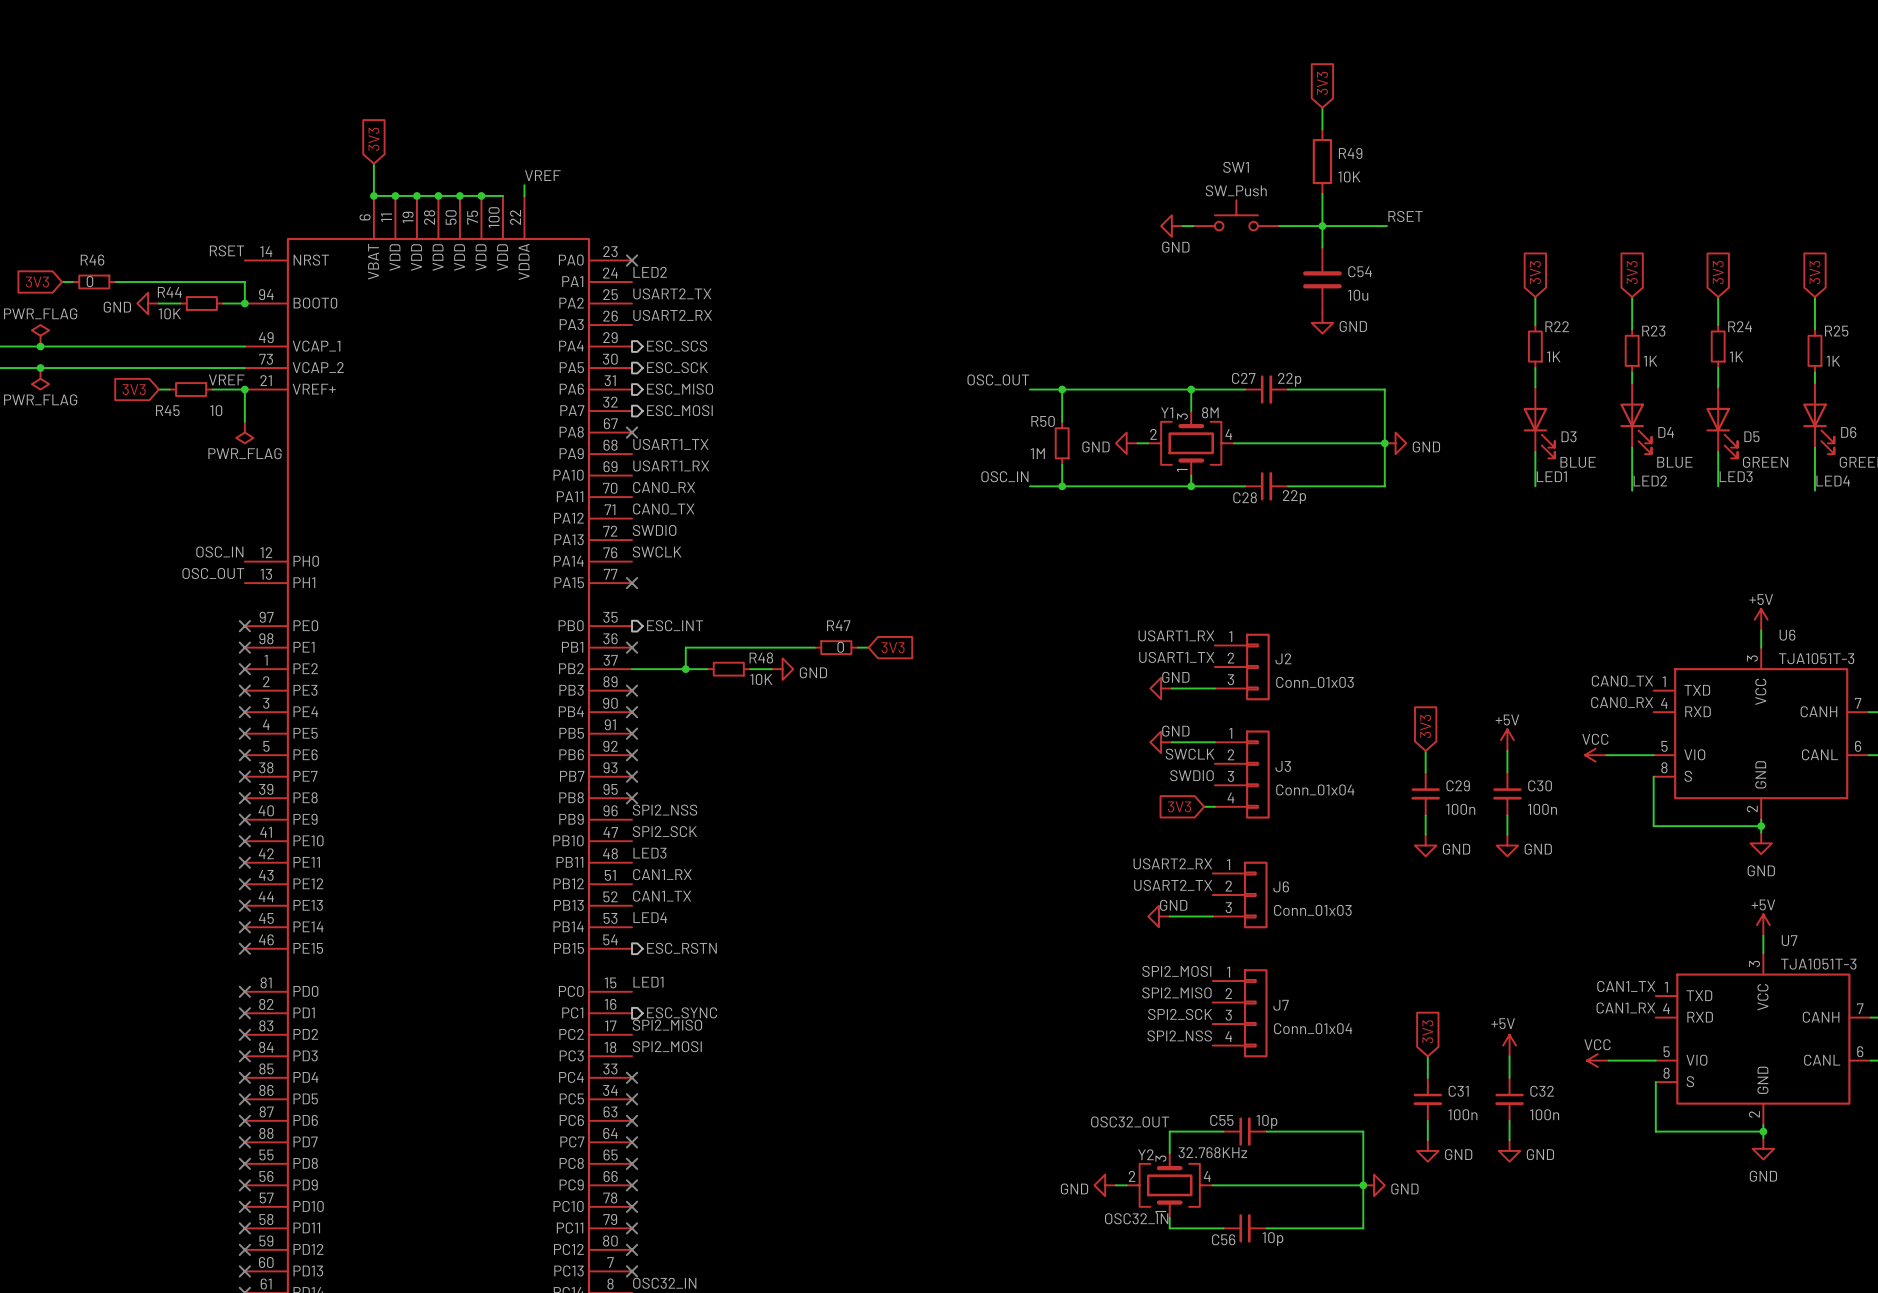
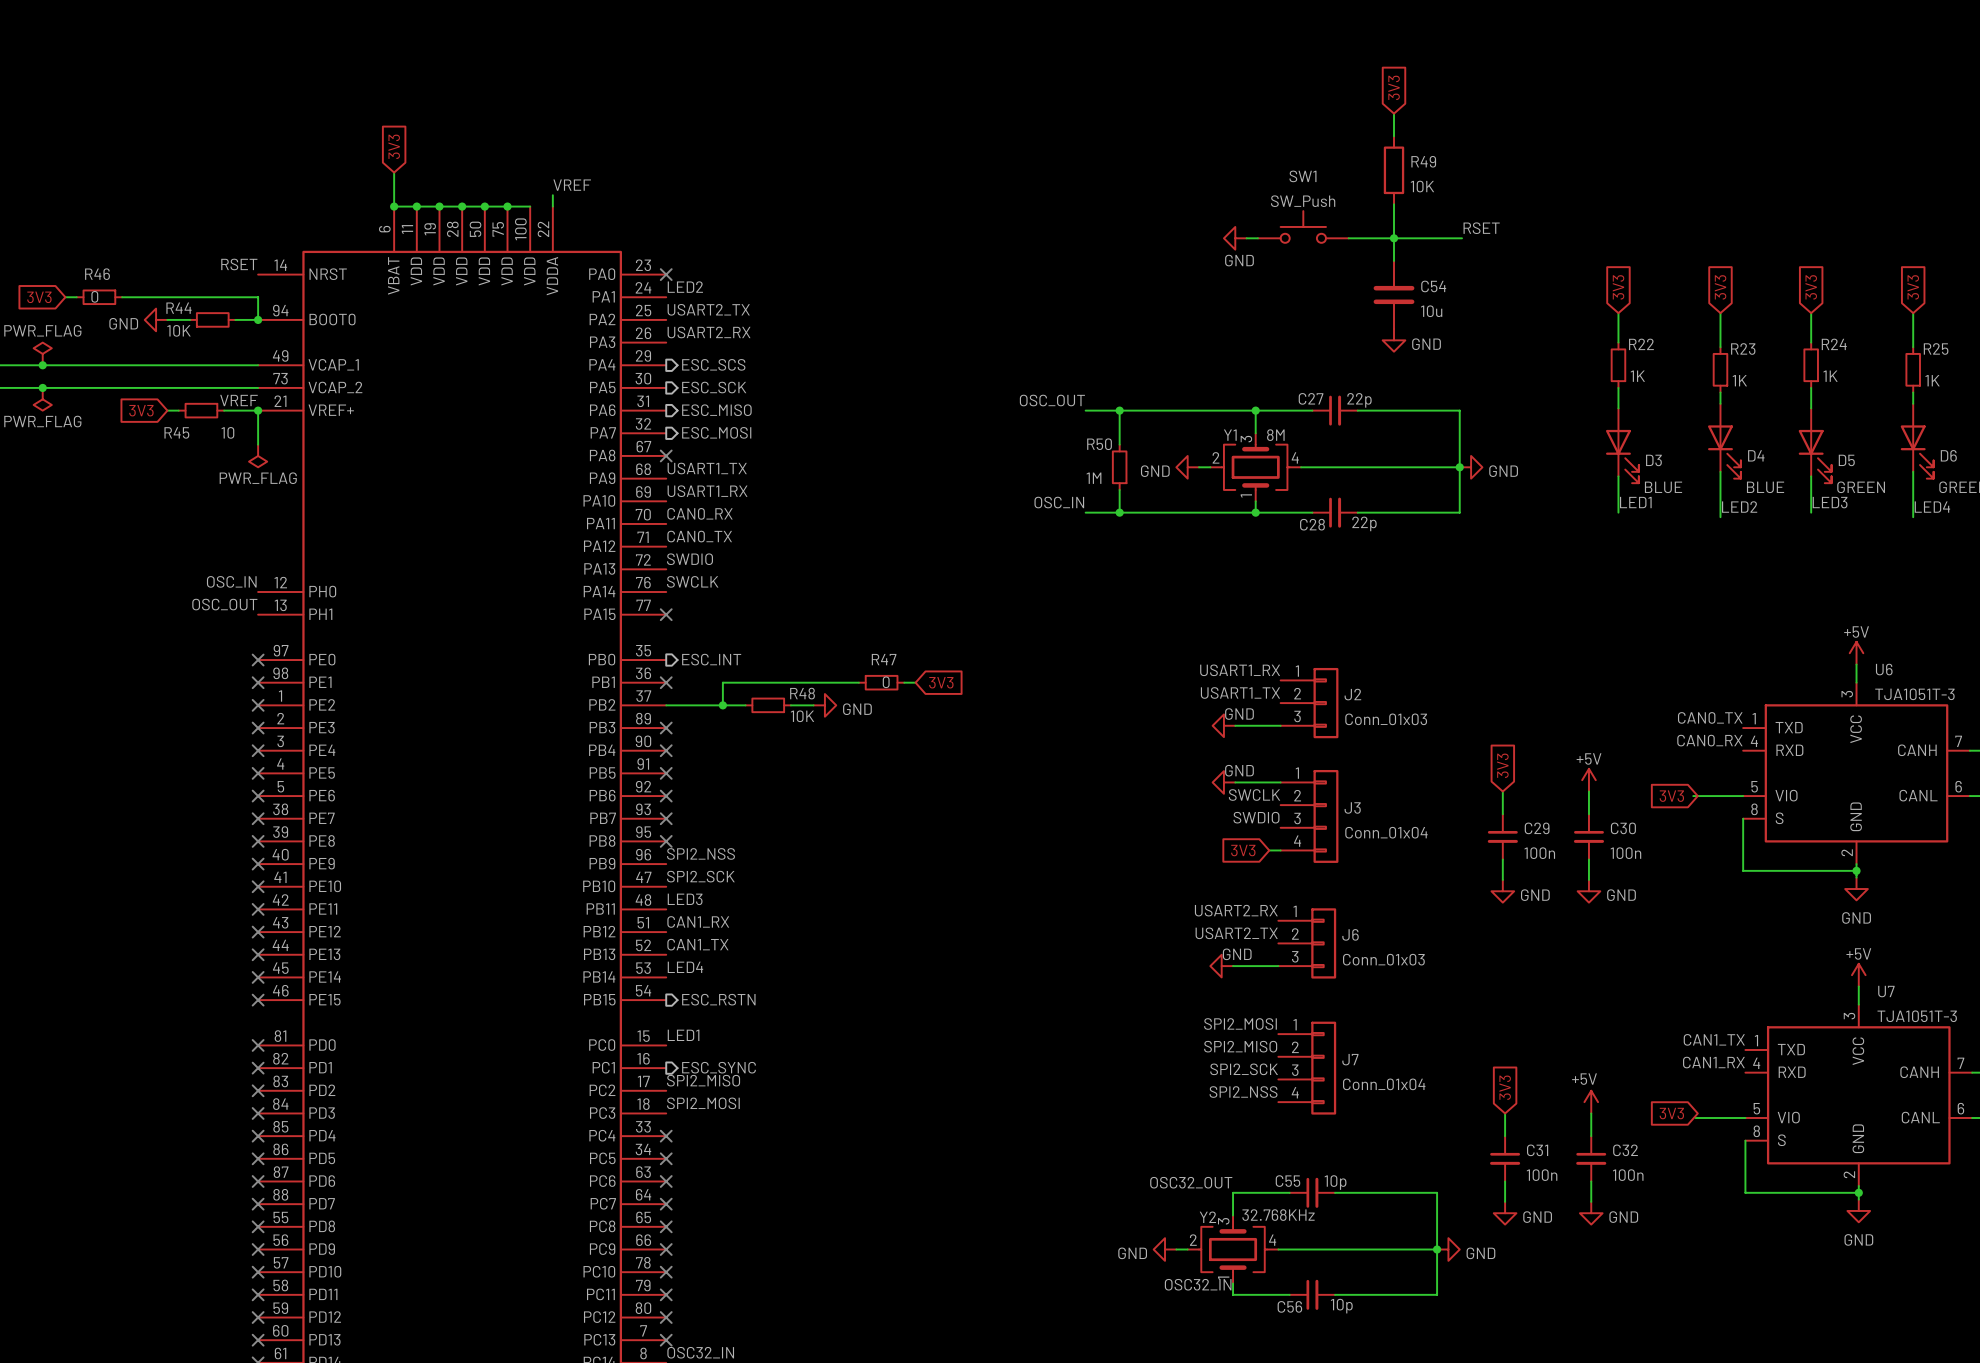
global label: none -> 3V3 (1671, 796)
power symbol: VCC (1595, 755) -> none
global label: none -> 3V3 (1671, 1113)
power symbol: VCC (1597, 1060) -> none

